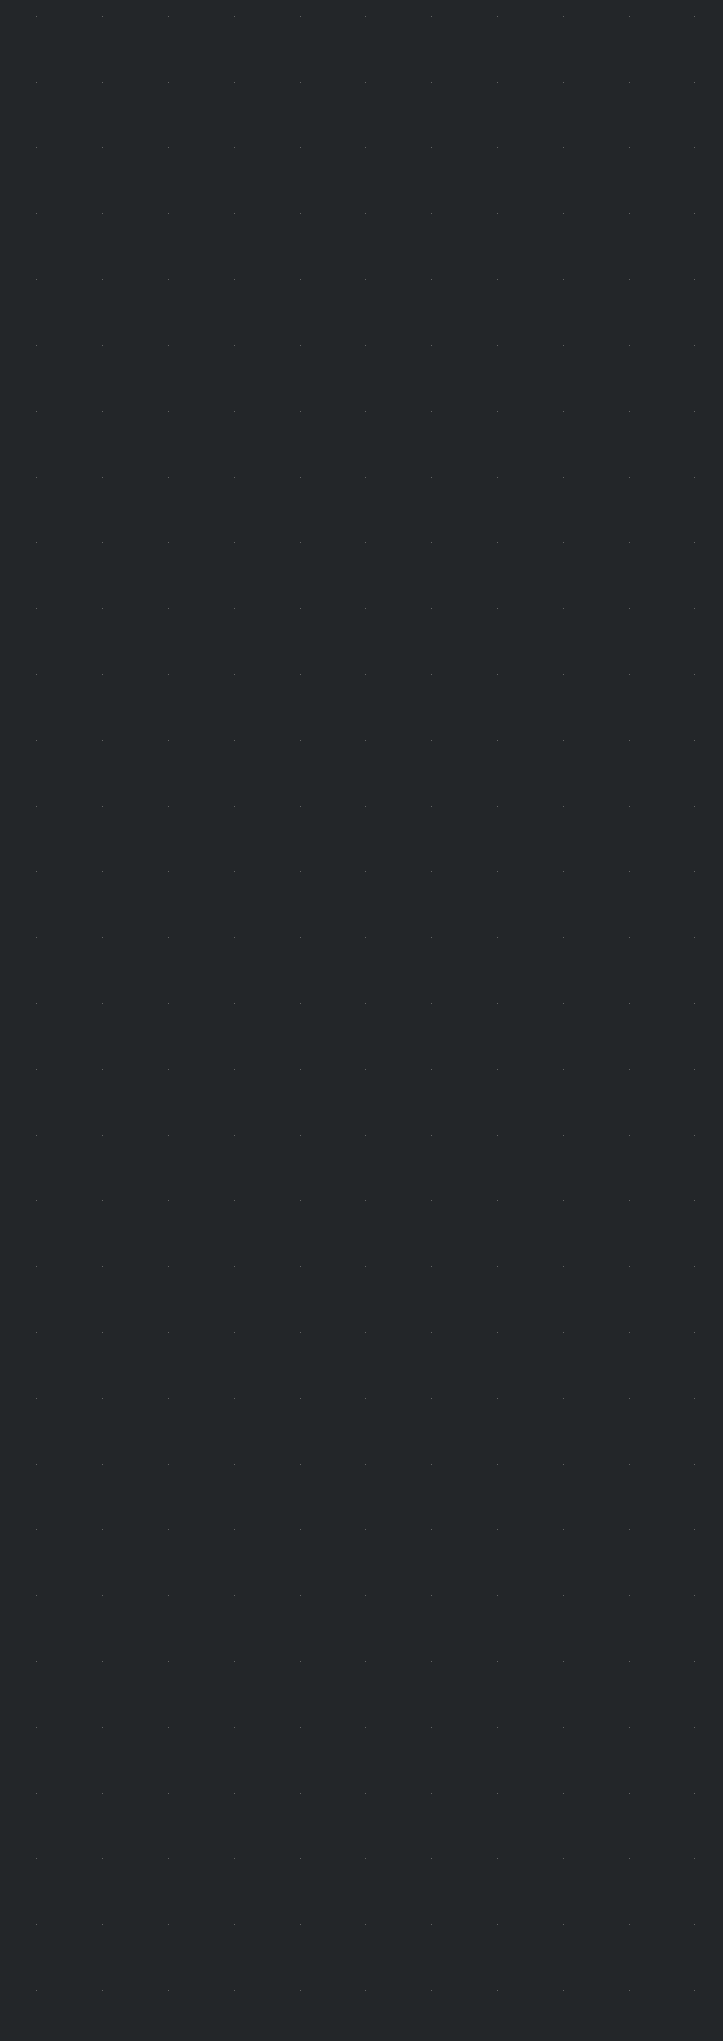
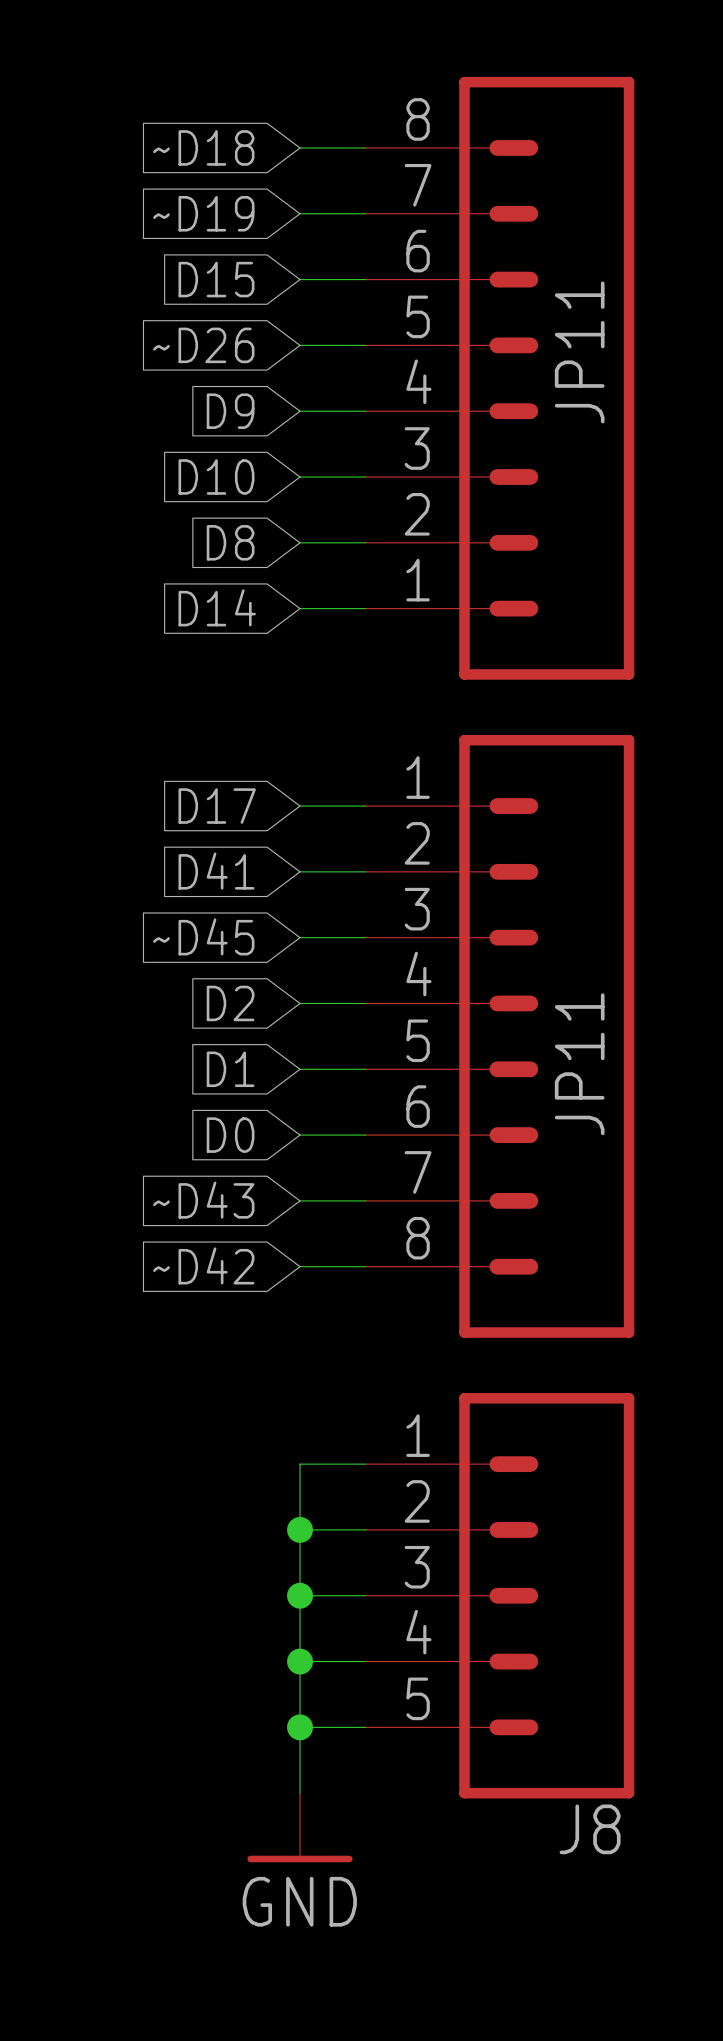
global label: none -> ~D18 (203, 147)
wire: none -> (300, 147) (365, 147)
global label: none -> ~D19 (203, 213)
wire: none -> (300, 213) (365, 213)
global label: none -> D15 (216, 279)
wire: none -> (300, 279) (365, 279)
global label: none -> ~D26 (203, 345)
wire: none -> (300, 345) (365, 345)
part: none -> JP11 (500, 378)
global label: none -> D9 (230, 411)
wire: none -> (300, 411) (365, 411)
global label: none -> D10 (216, 477)
wire: none -> (300, 477) (365, 477)
global label: none -> D8 (230, 542)
wire: none -> (300, 542) (365, 542)
global label: none -> D14 (217, 607)
wire: none -> (300, 608) (365, 608)
global label: none -> D17 (217, 806)
wire: none -> (300, 806) (365, 806)
global label: none -> D41 (216, 871)
wire: none -> (300, 871) (365, 871)
global label: none -> ~D45 (203, 936)
wire: none -> (300, 937) (365, 937)
global label: none -> D2 (230, 1003)
wire: none -> (300, 1003) (365, 1003)
part: none -> JP11 (500, 1036)
global label: none -> D1 (230, 1069)
wire: none -> (300, 1069) (365, 1069)
global label: none -> D0 (230, 1135)
wire: none -> (300, 1135) (365, 1135)
global label: none -> ~D43 (203, 1200)
wire: none -> (300, 1200) (365, 1200)
global label: none -> ~D42 (203, 1265)
wire: none -> (300, 1266) (365, 1266)
wire: none -> (365, 1464) (300, 1464) (300, 1793)
wire: none -> (300, 1529) (365, 1529)
junction: none -> (300, 1529)
wire: none -> (300, 1595) (365, 1595)
junction: none -> (300, 1595)
J8: none -> (500, 1595)
wire: none -> (300, 1661) (365, 1661)
junction: none -> (300, 1661)
wire: none -> (300, 1727) (365, 1727)
junction: none -> (300, 1727)
power symbol: none -> GND (300, 1827)

